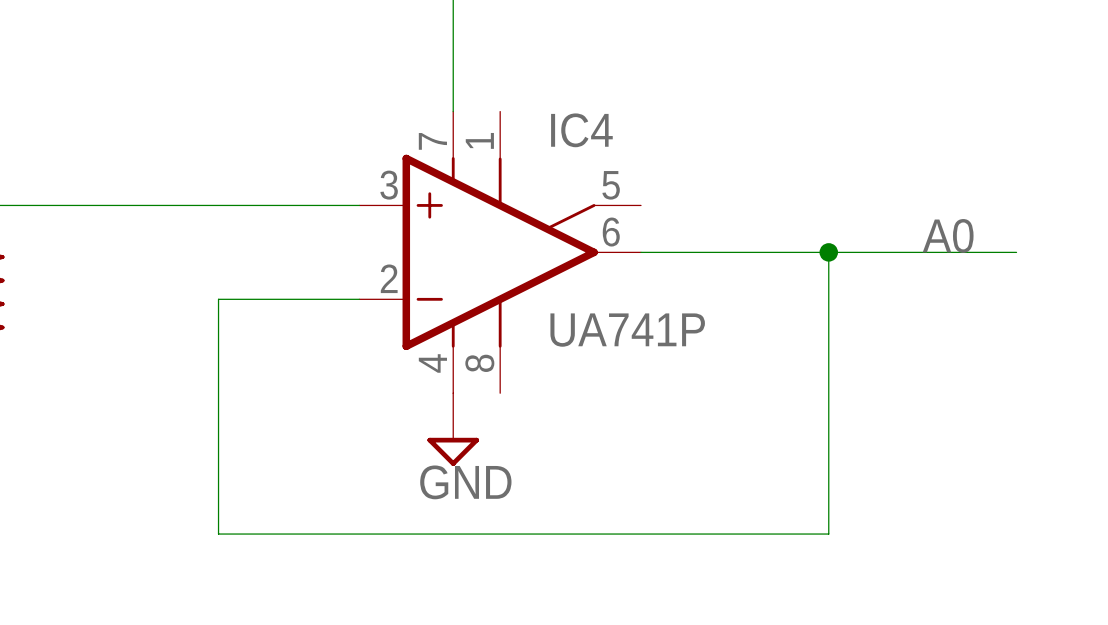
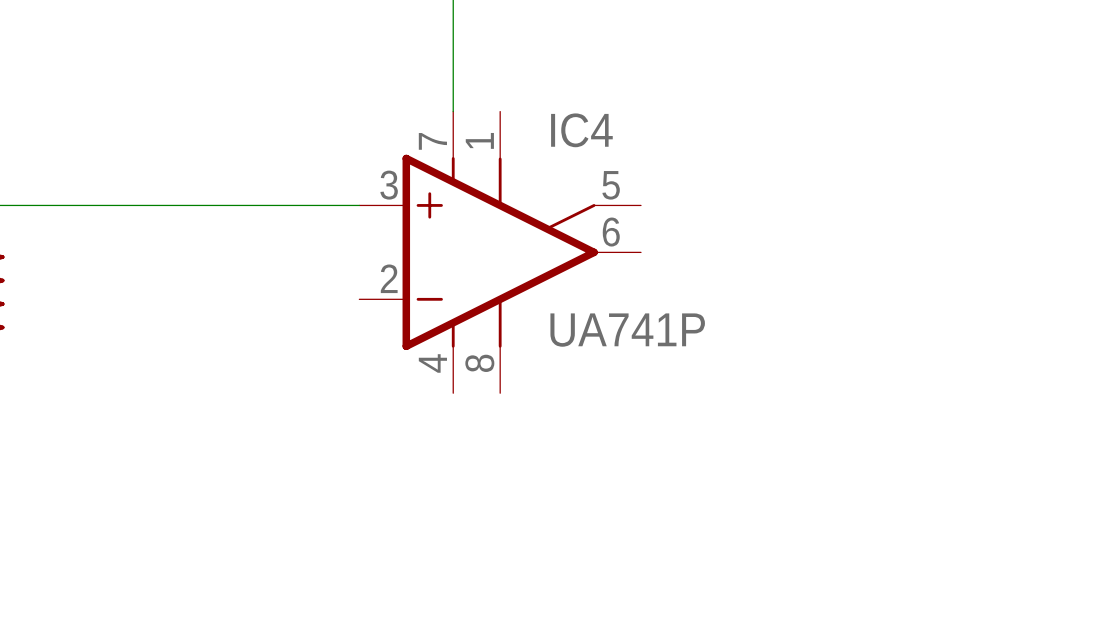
label: A0 (948, 235) -> none
wire: (641, 252) (1016, 252) -> none
wire: (828, 252) (828, 534) (218, 534) (218, 299) (359, 299) -> none
junction: (828, 252) -> none
power symbol: GND (453, 429) -> none

